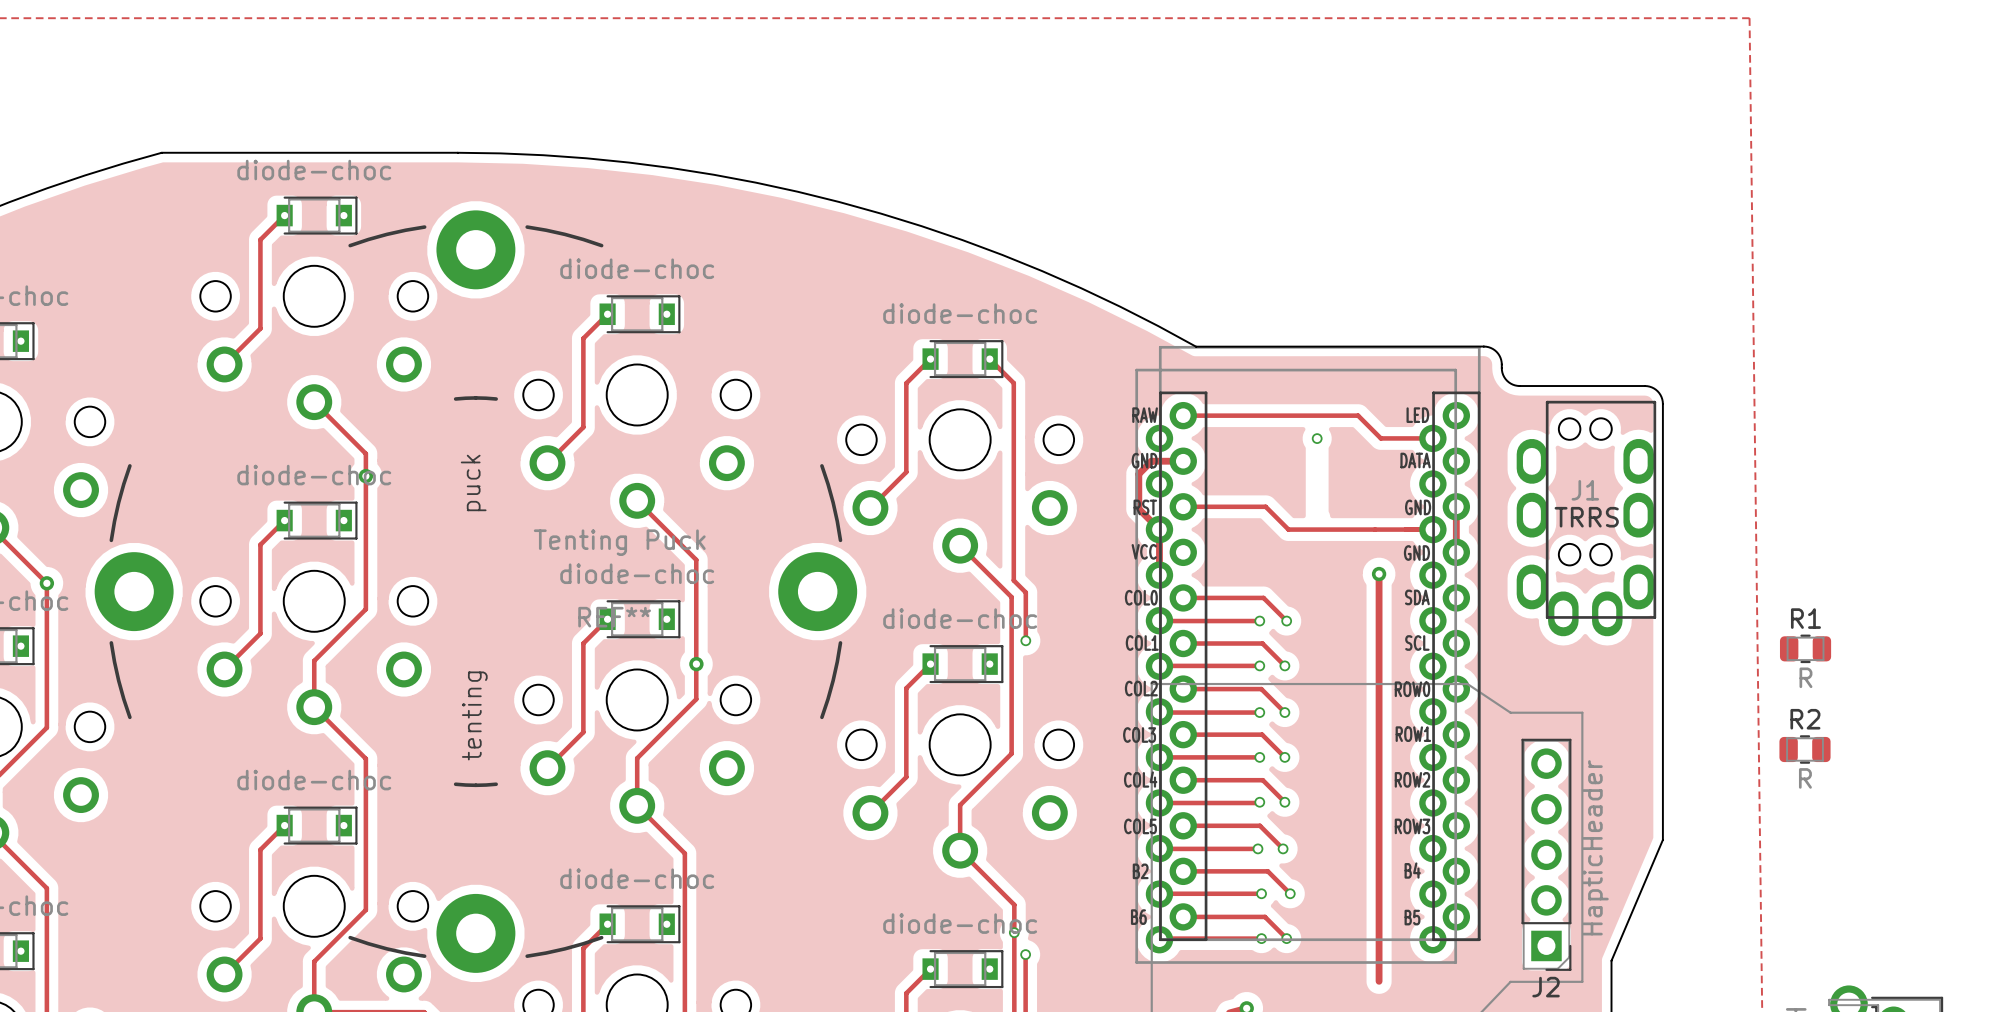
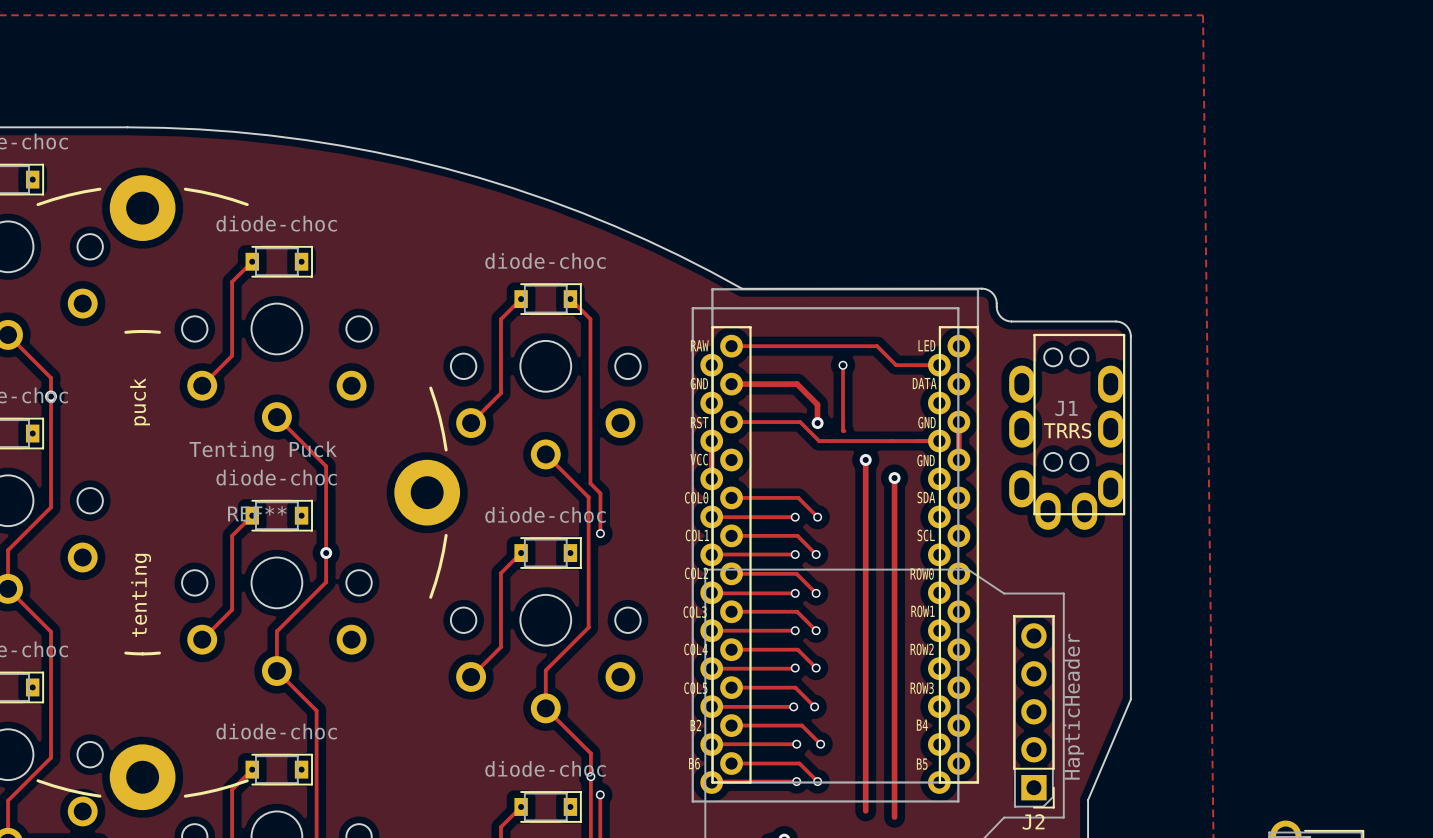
track: none -> (843, 365) (844, 430)
track: (1183, 461) (1151, 461) (1138, 474) (1138, 508) (1159, 529) -> (731, 384) (797, 384) (817, 404) (817, 422)
via: none -> (817, 423)
track: none -> (865, 459) (865, 810)
via: none -> (865, 459)
R1: R (1805, 648) -> none
R2: R (1805, 749) -> none

